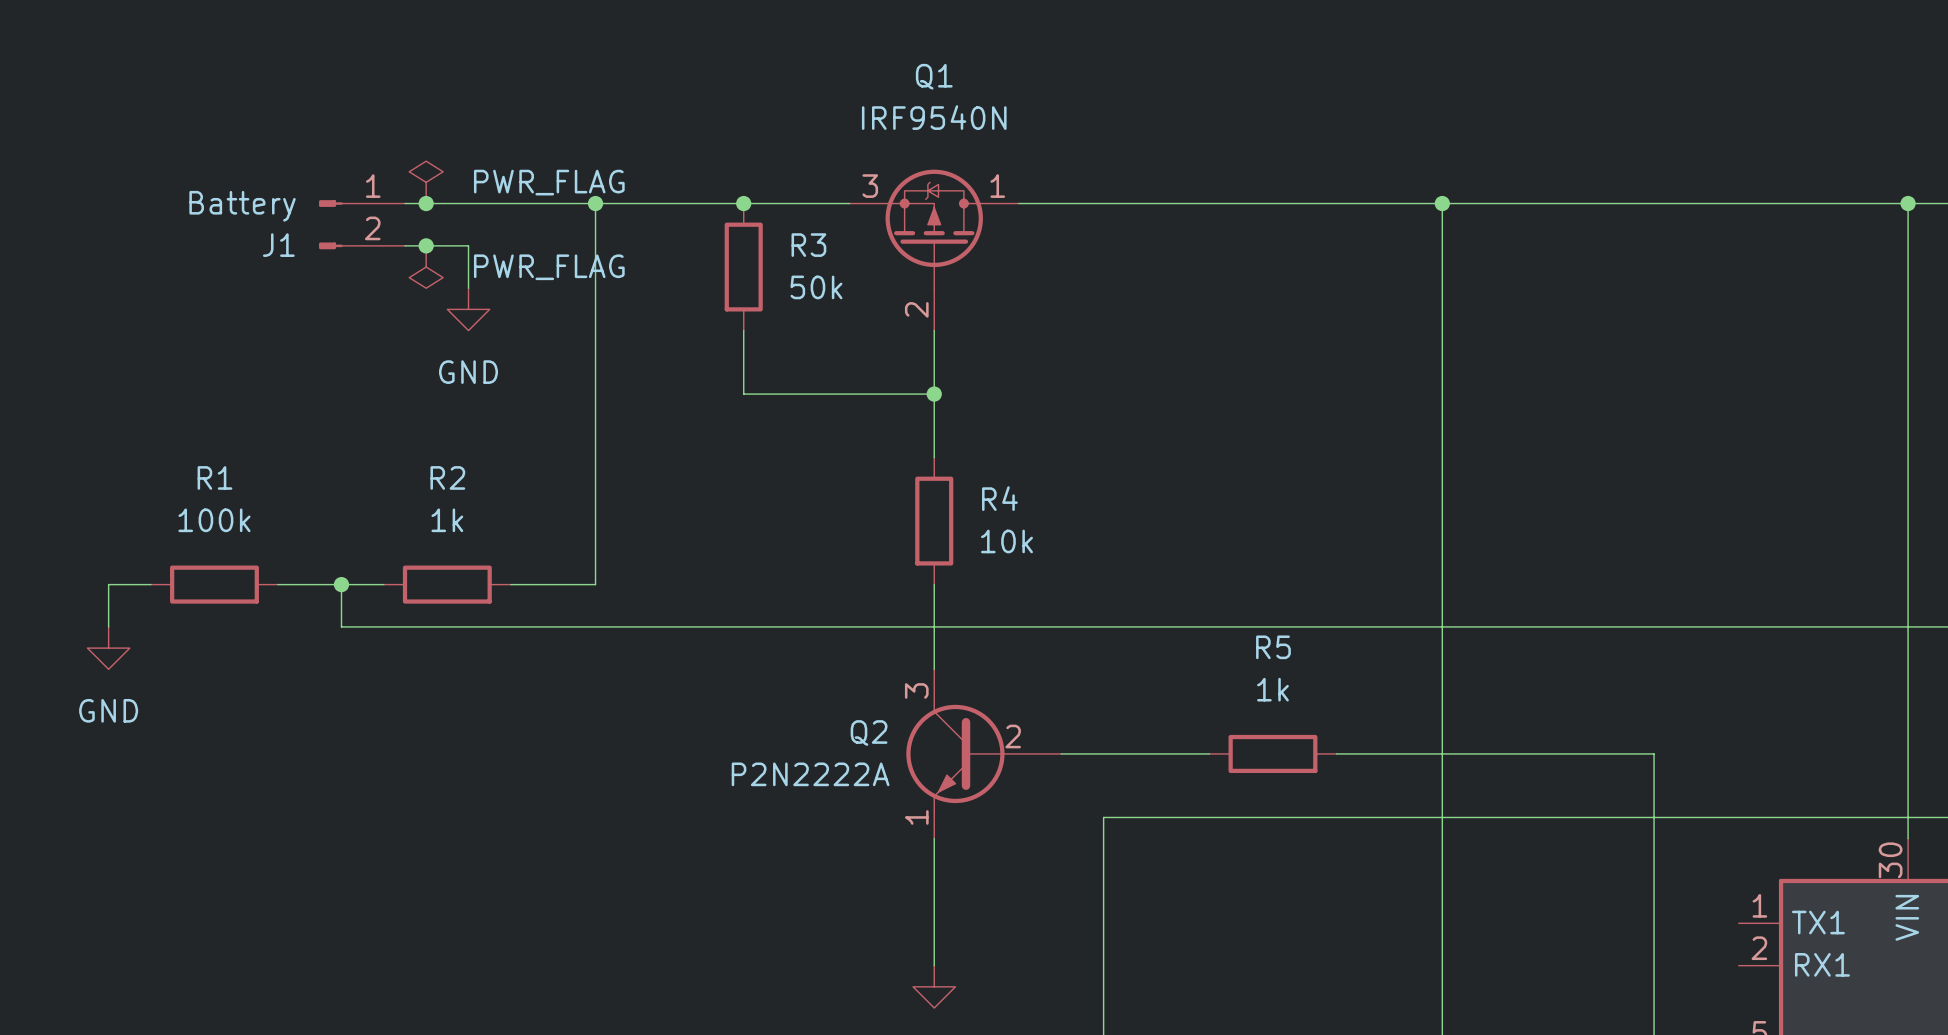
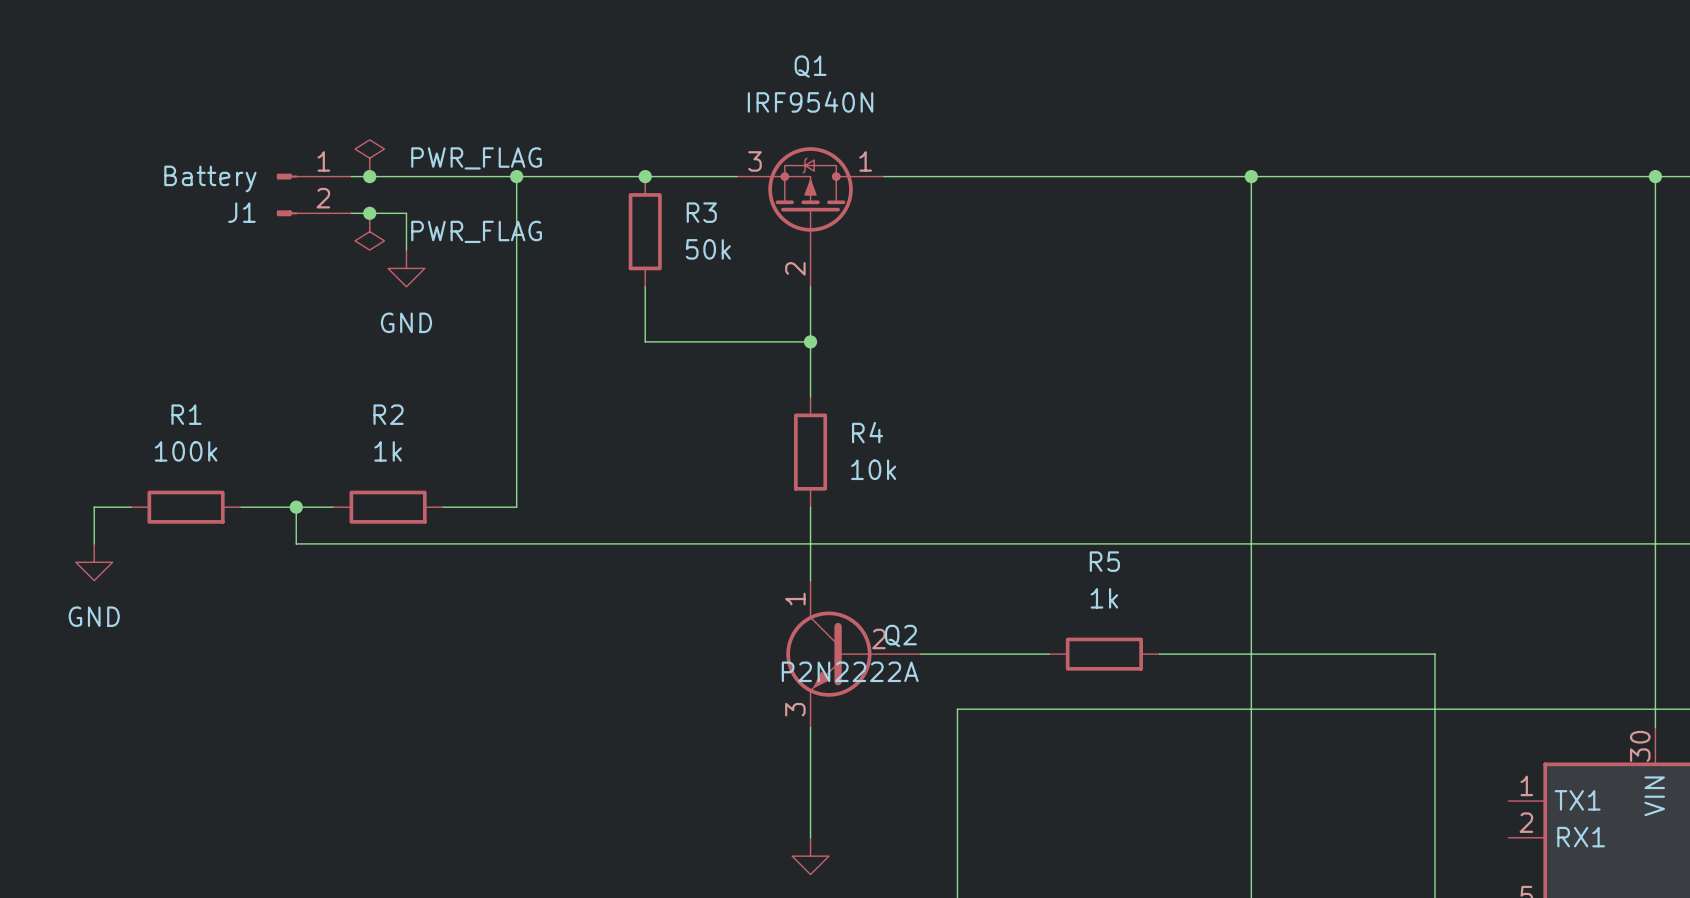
Q2 pin number: 3 (916, 690) -> 1 (795, 599)
Q2 name position: Q2 (869, 733) -> Q2 (900, 635)
Q2 value position: P2N2222A (810, 774) -> P2N2222A (850, 671)
Q2 pin number: 1 (916, 817) -> 3 (795, 709)

